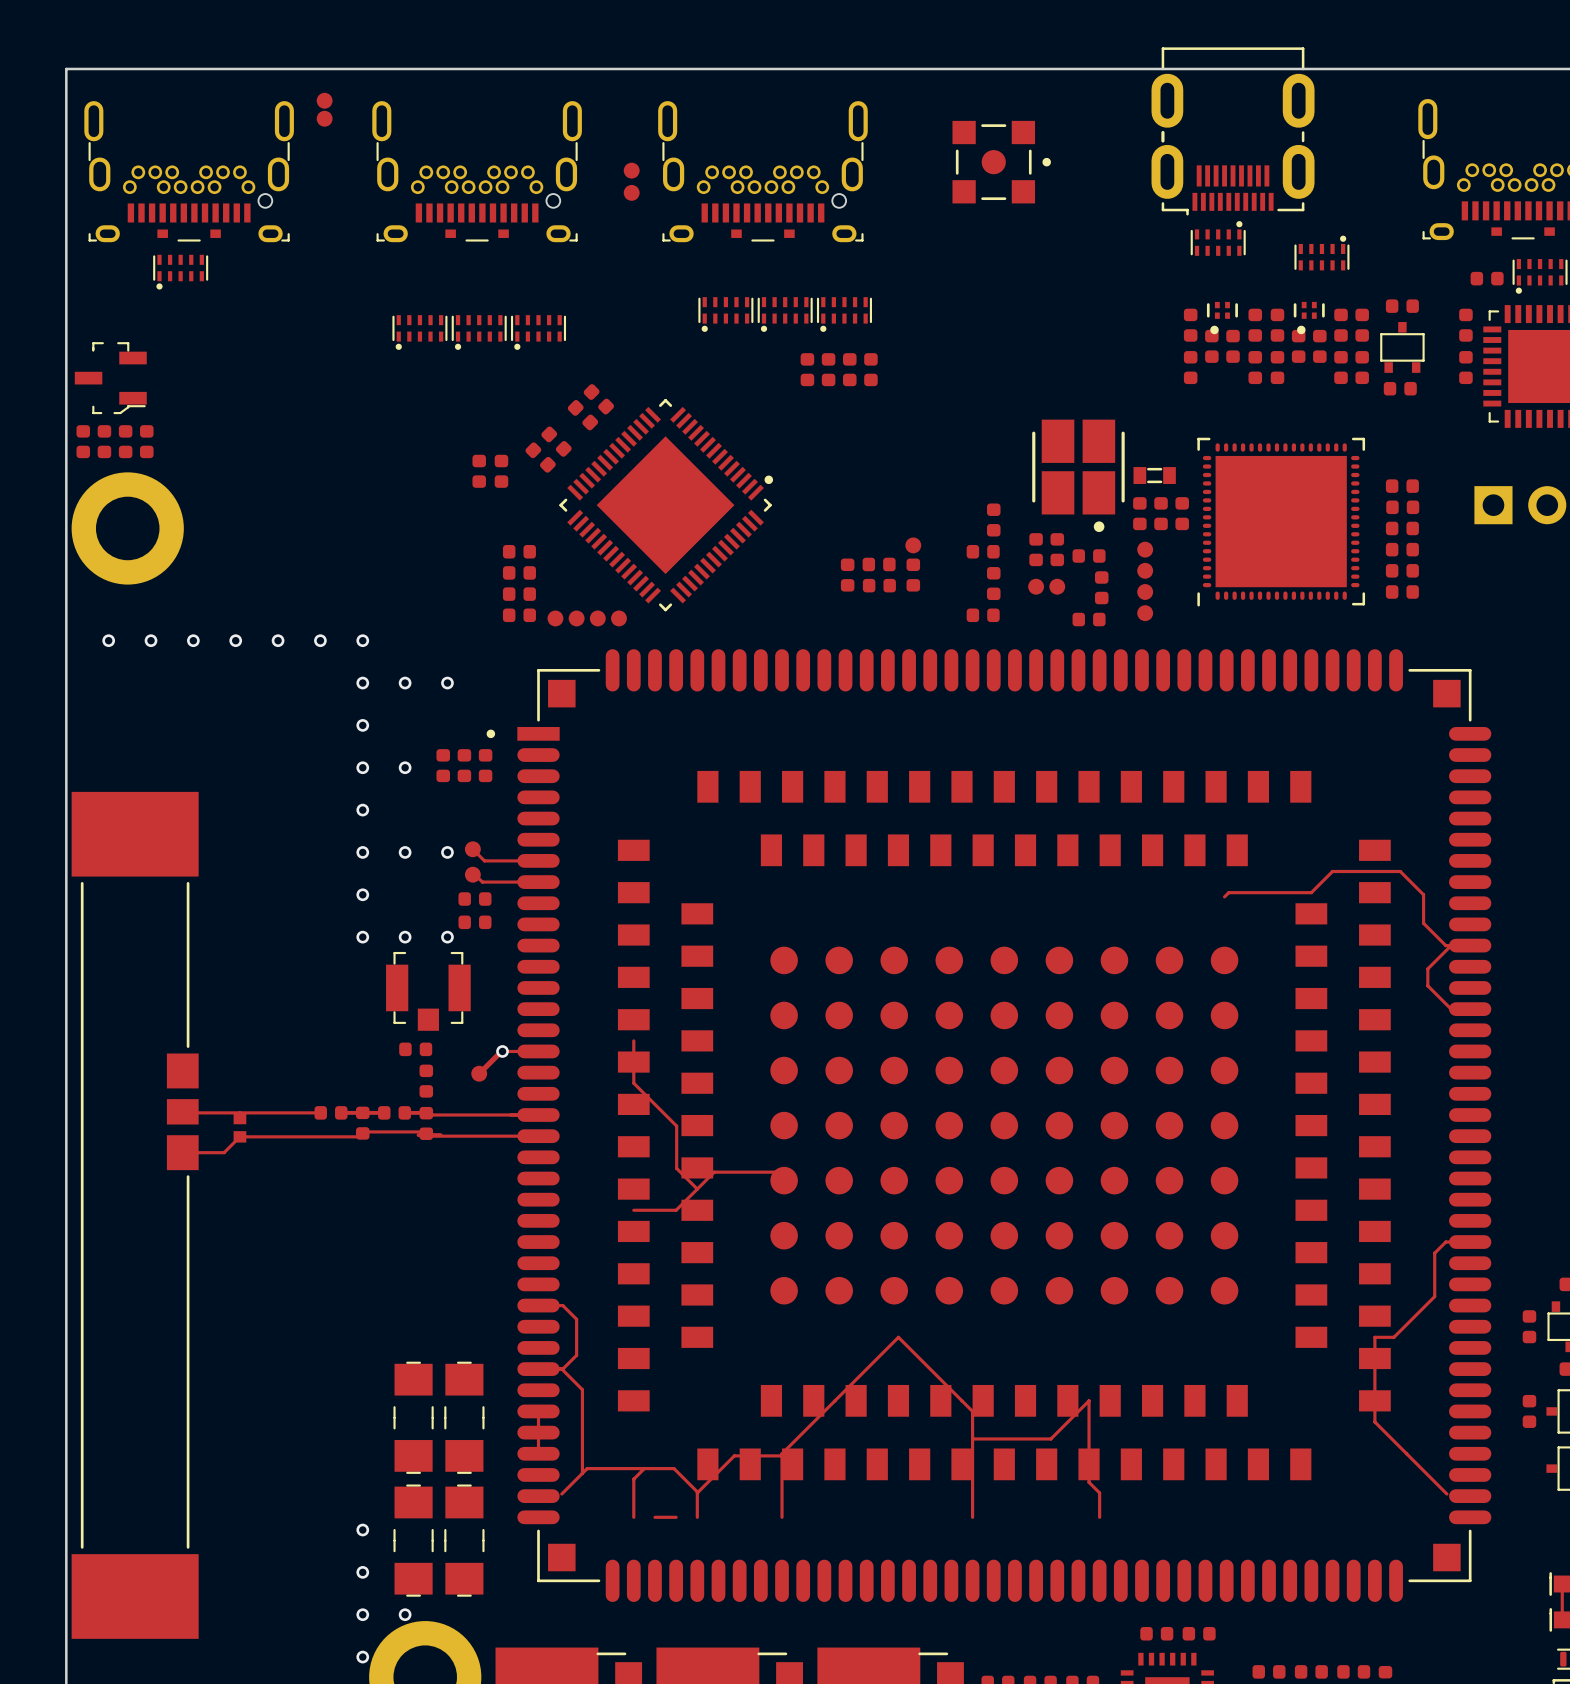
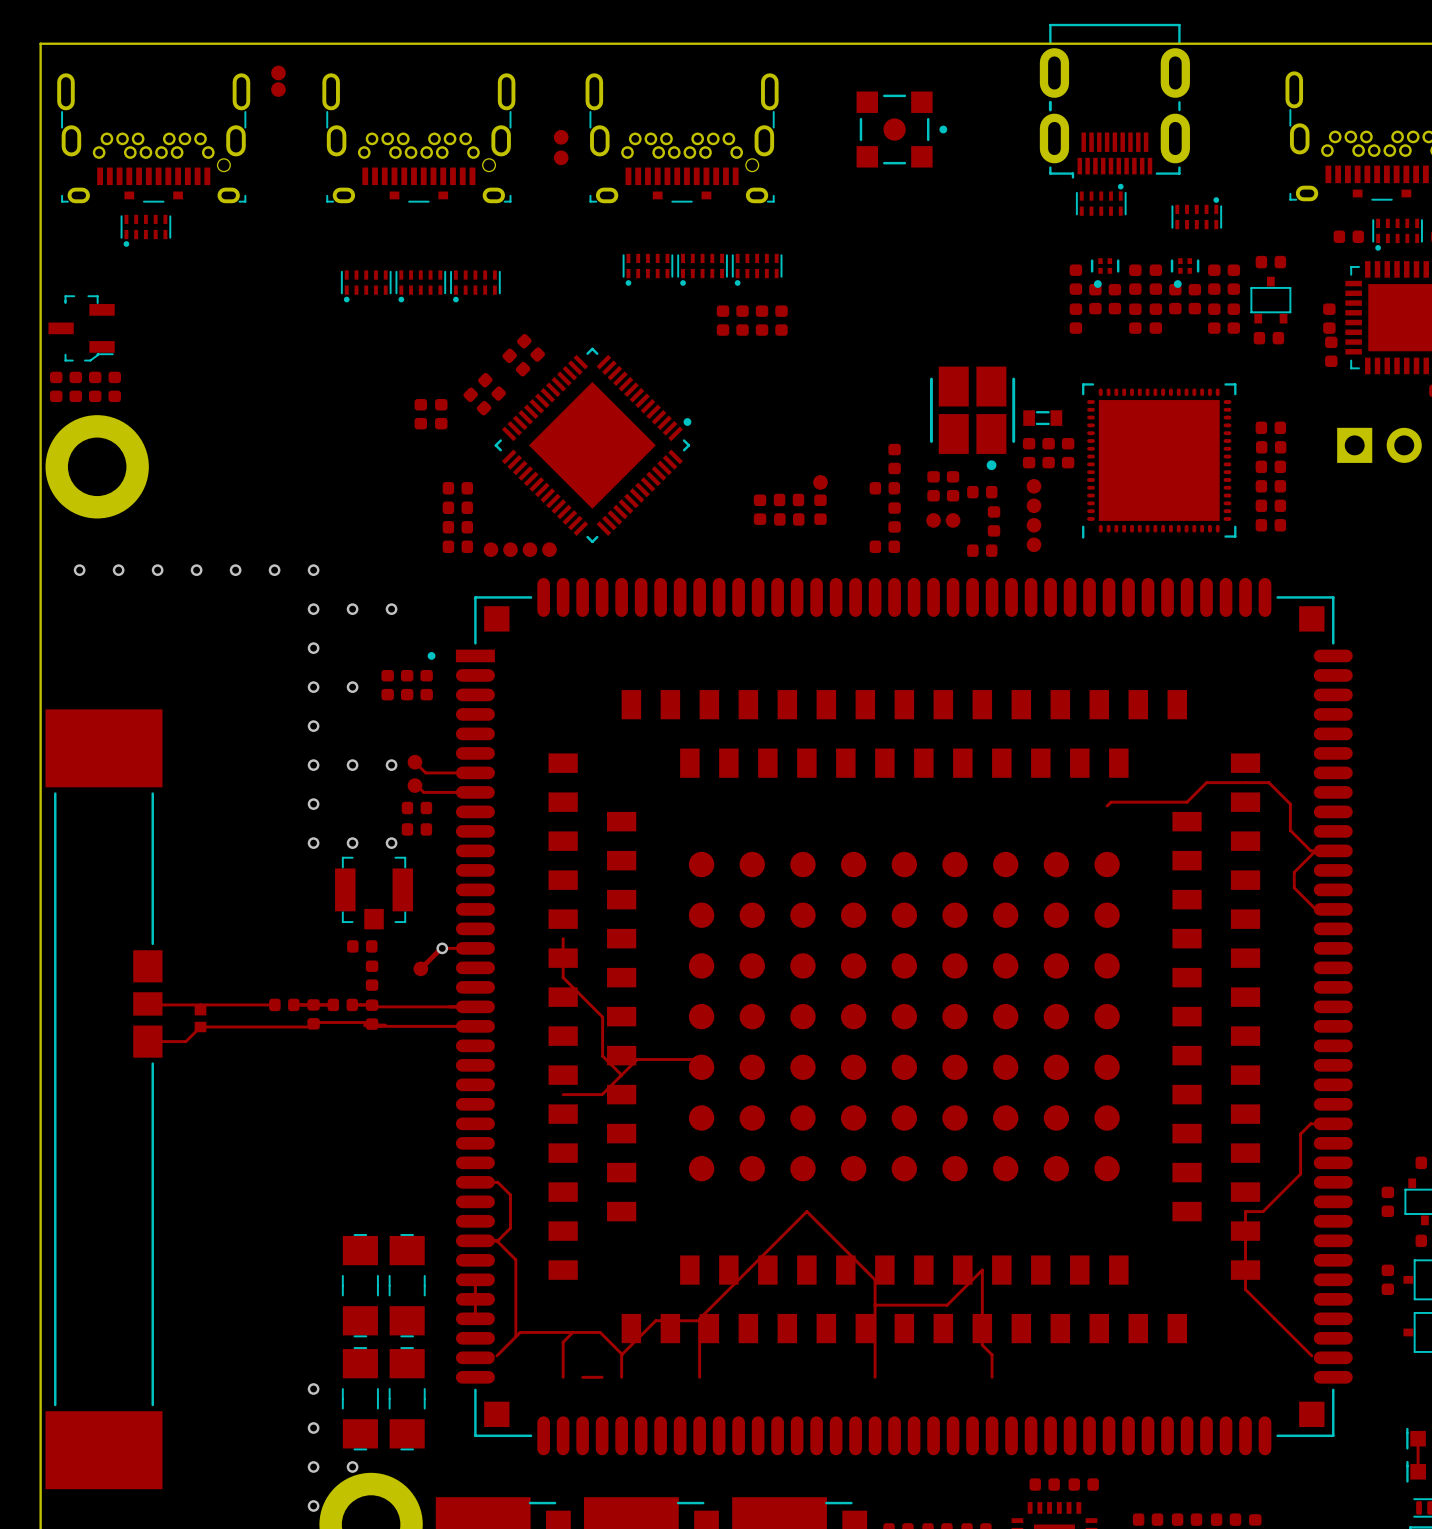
part position: (1465, 325) -> (1331, 351)

